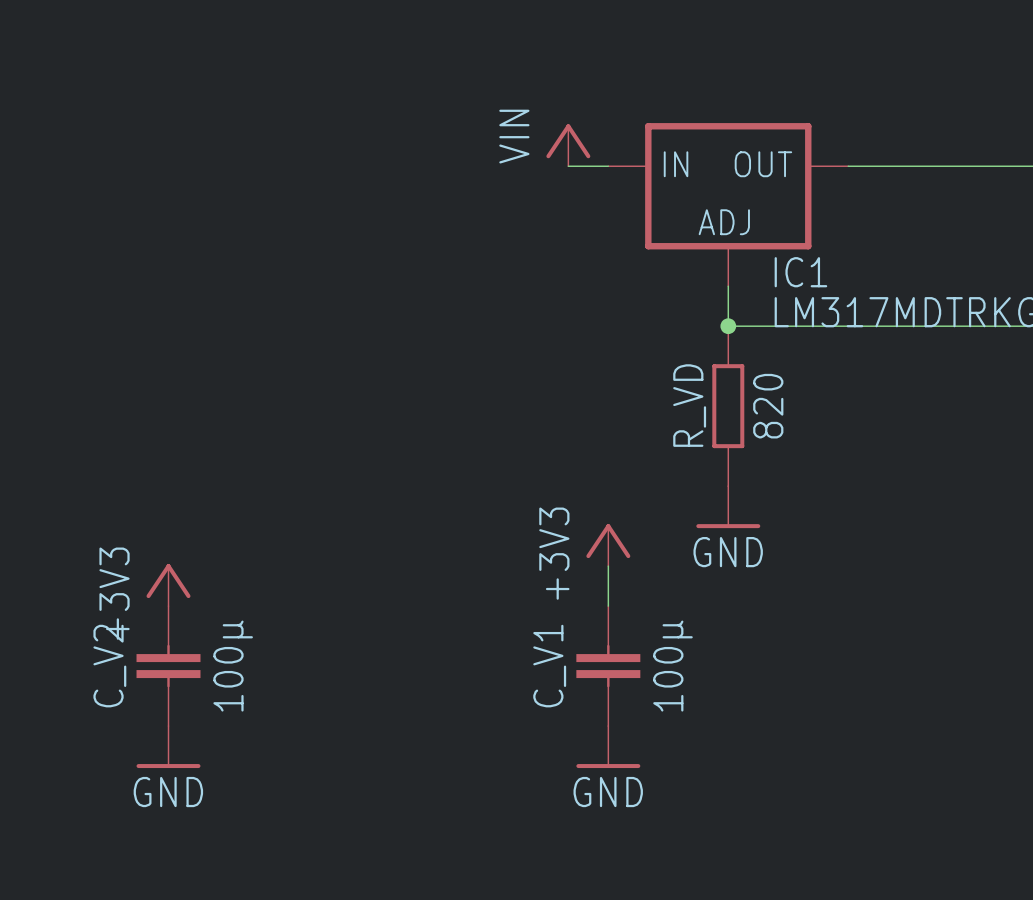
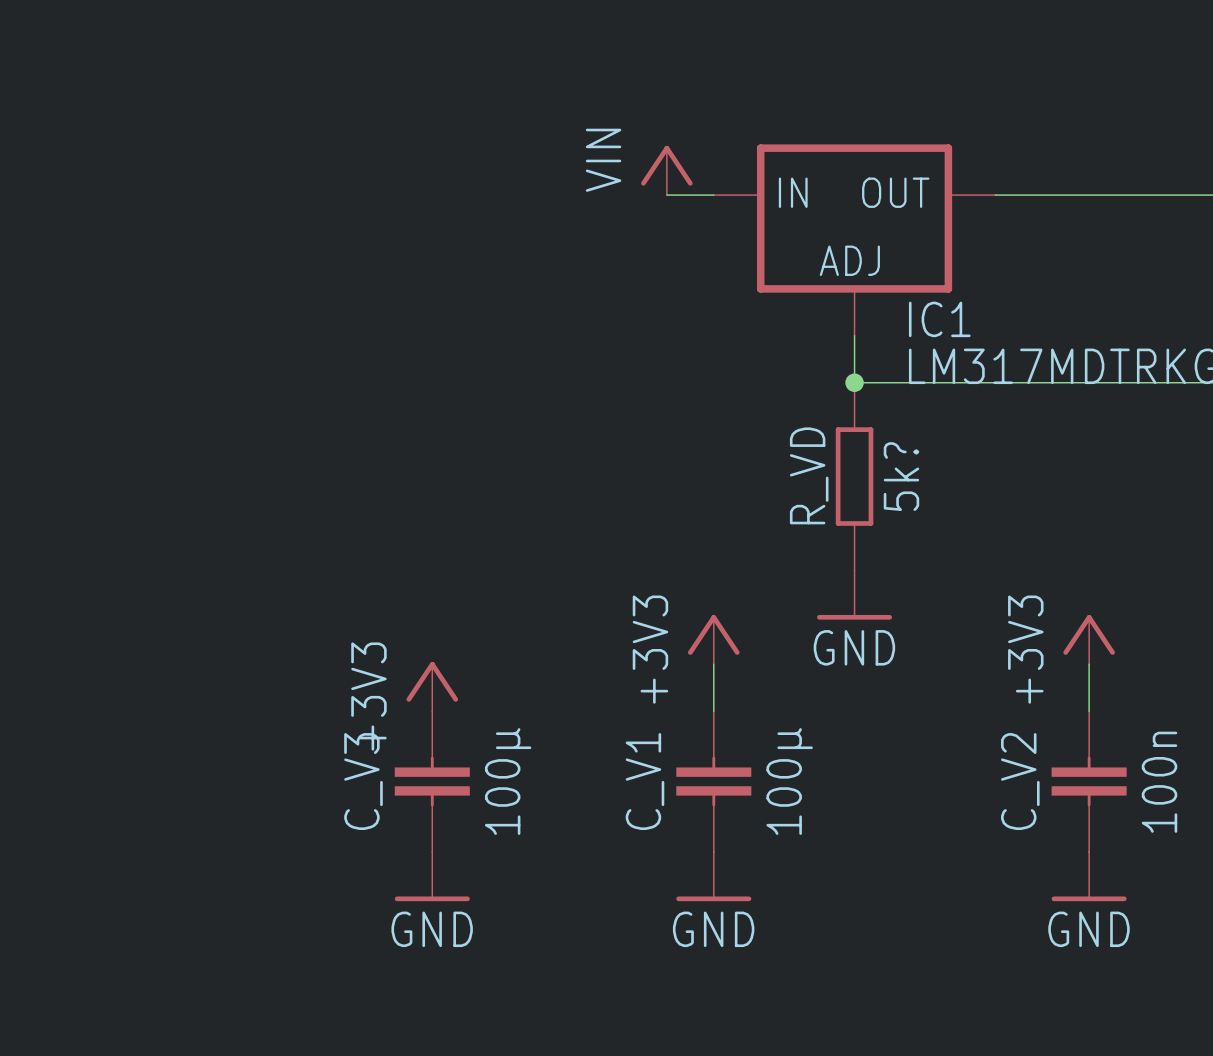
R_VD value: 820 (768, 406) -> 5k? (901, 476)
power symbol: none -> +3V3 (1089, 639)
wire: none -> (1089, 664) (1089, 711)
power symbol position: +3V3 (168, 585) -> +3V3 (432, 686)
C_V2 position: (168, 666) -> (1089, 781)
C_V2 value: 100µ (233, 666) -> 100n (1159, 782)
C_V3: none -> 100µ (432, 781)
power symbol position: GND (168, 747) -> GND (432, 876)
power symbol: none -> GND (1089, 876)

